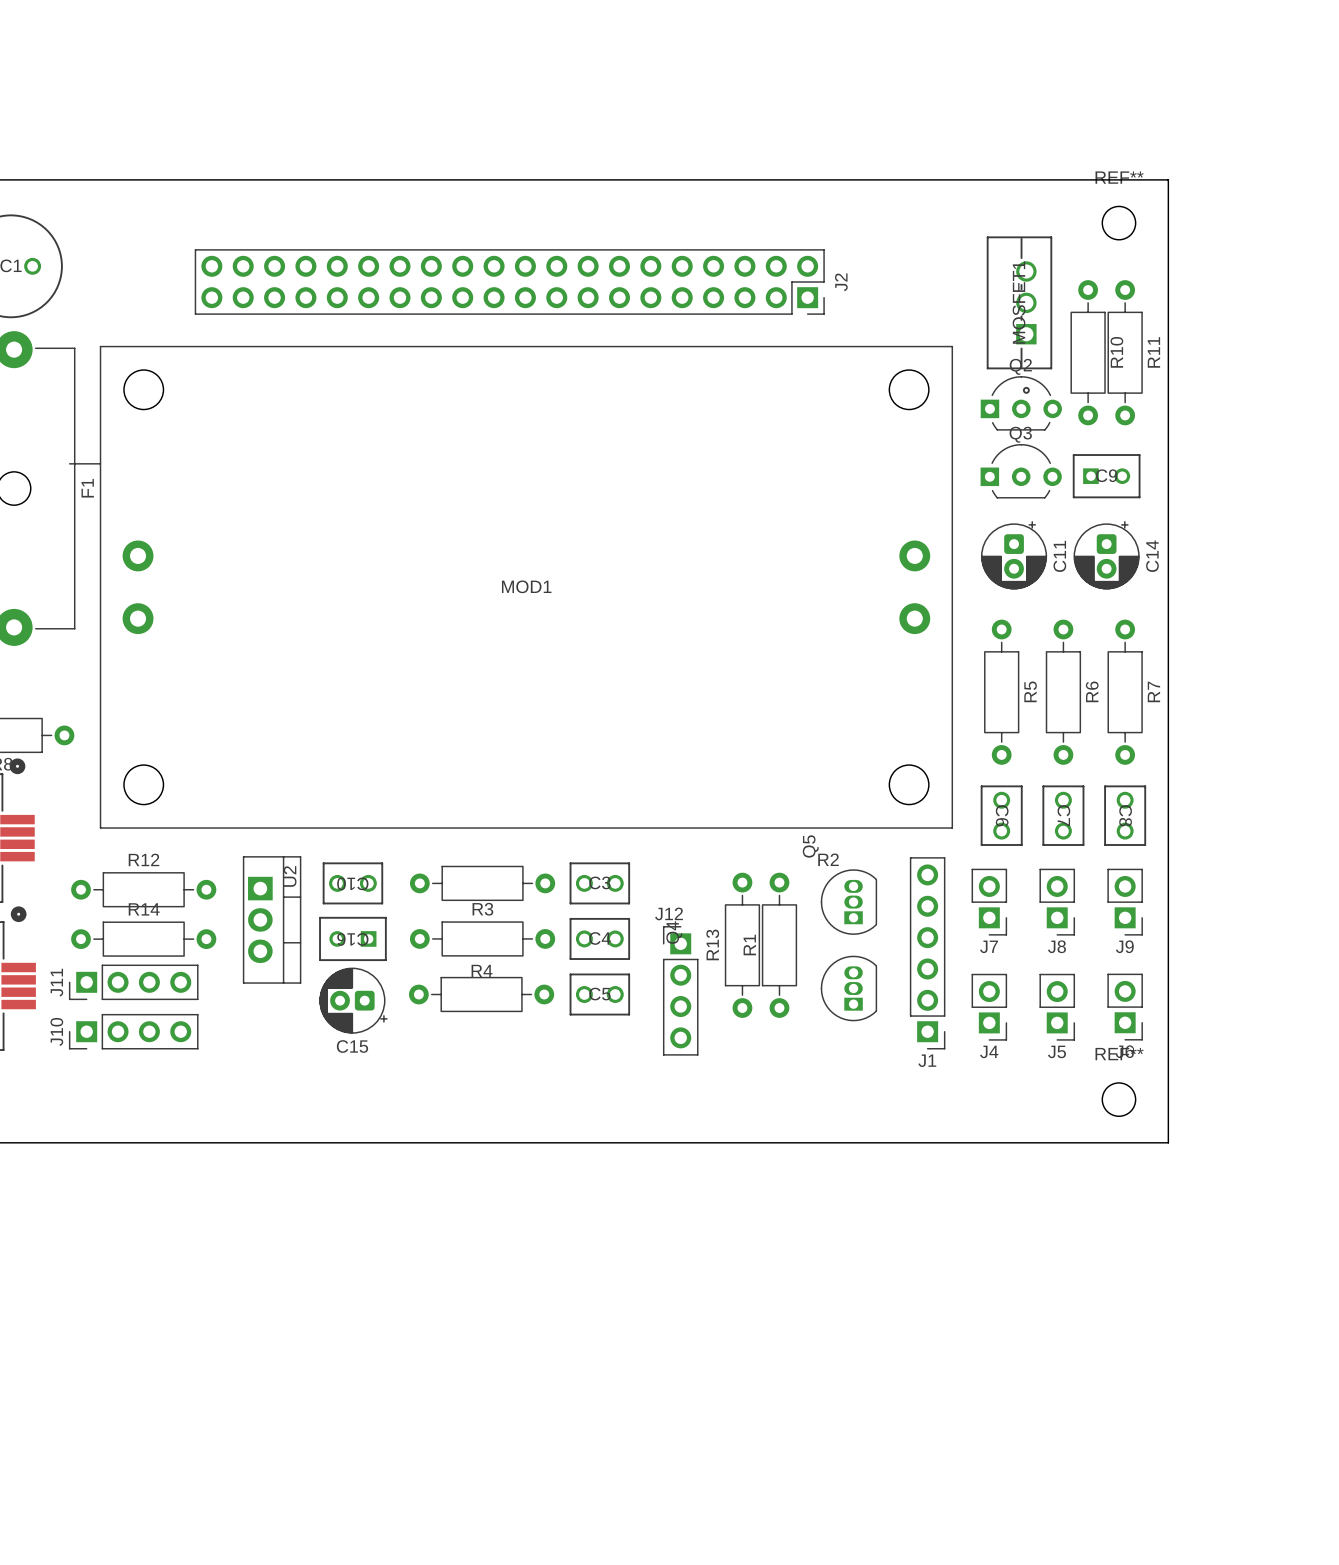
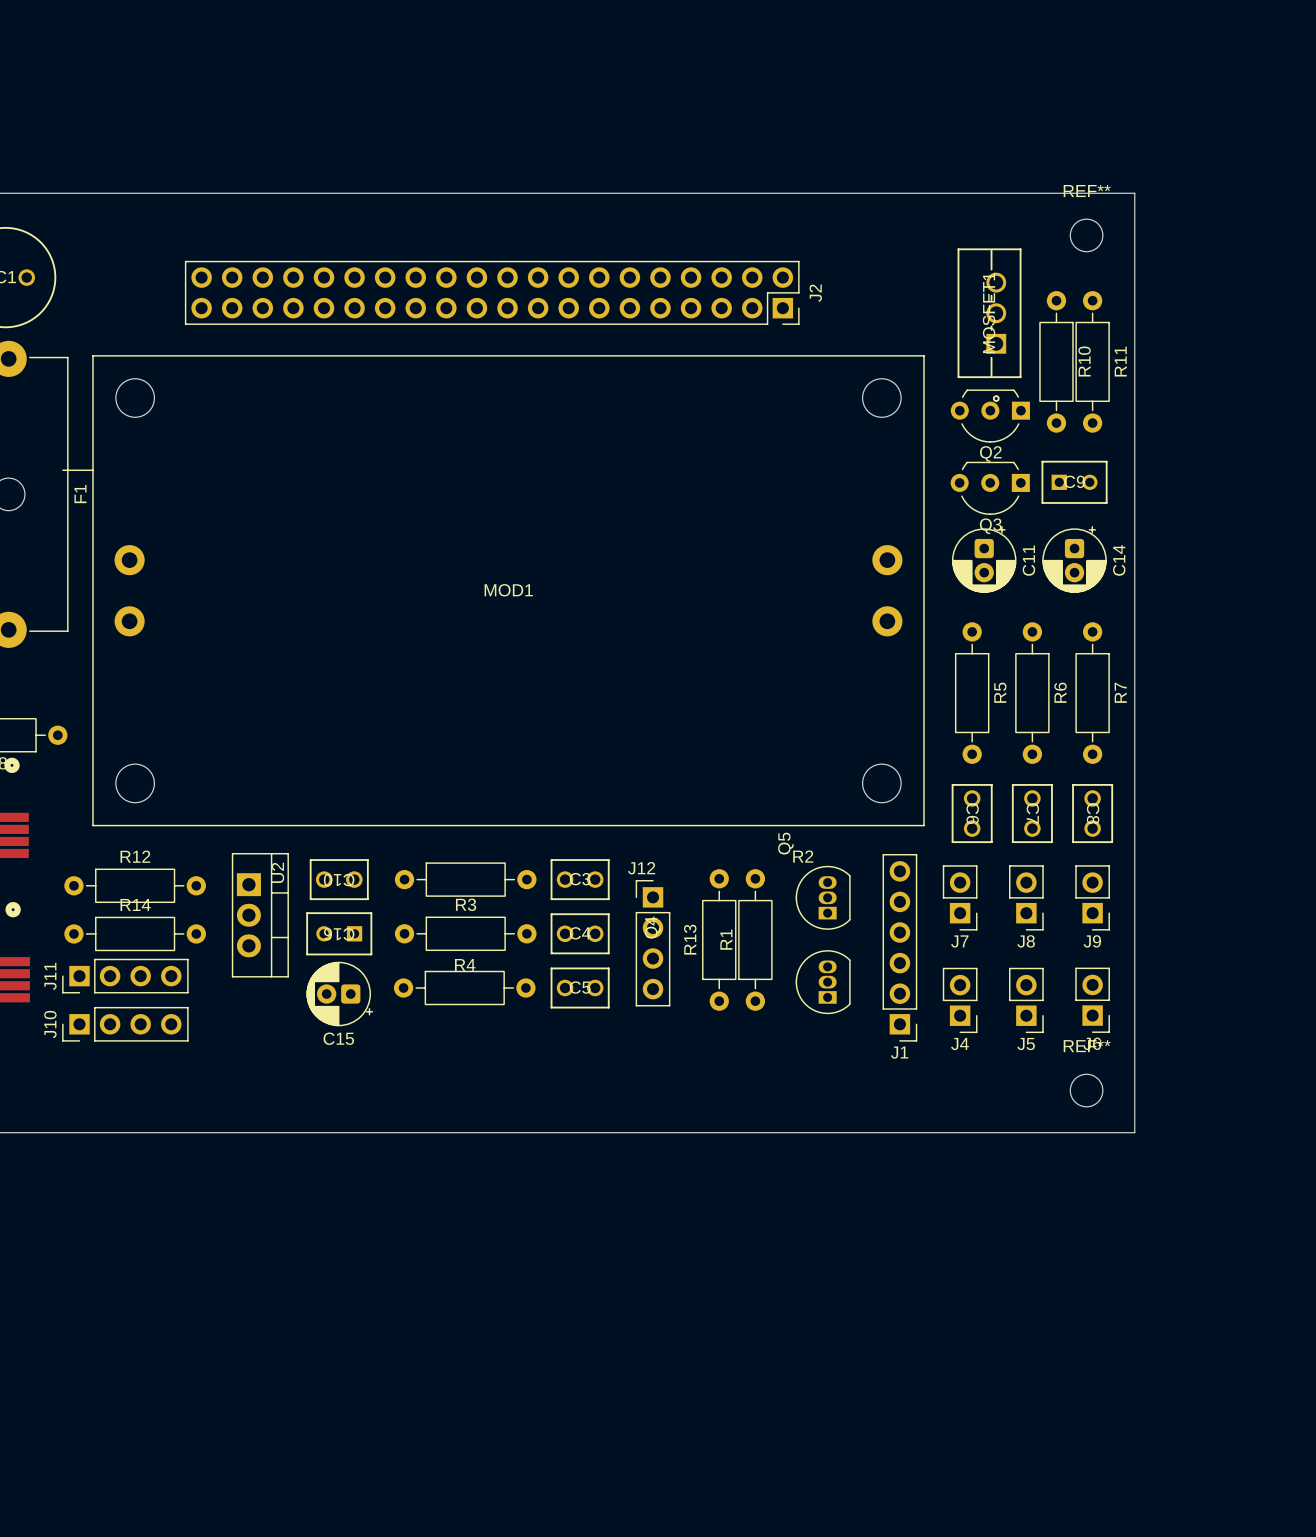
Q2 rotation: 0° (1021, 403) -> 180° (990, 416)
Q3 rotation: 0° (1021, 471) -> 180° (990, 488)
J12 position: (680, 990) -> (653, 943)

